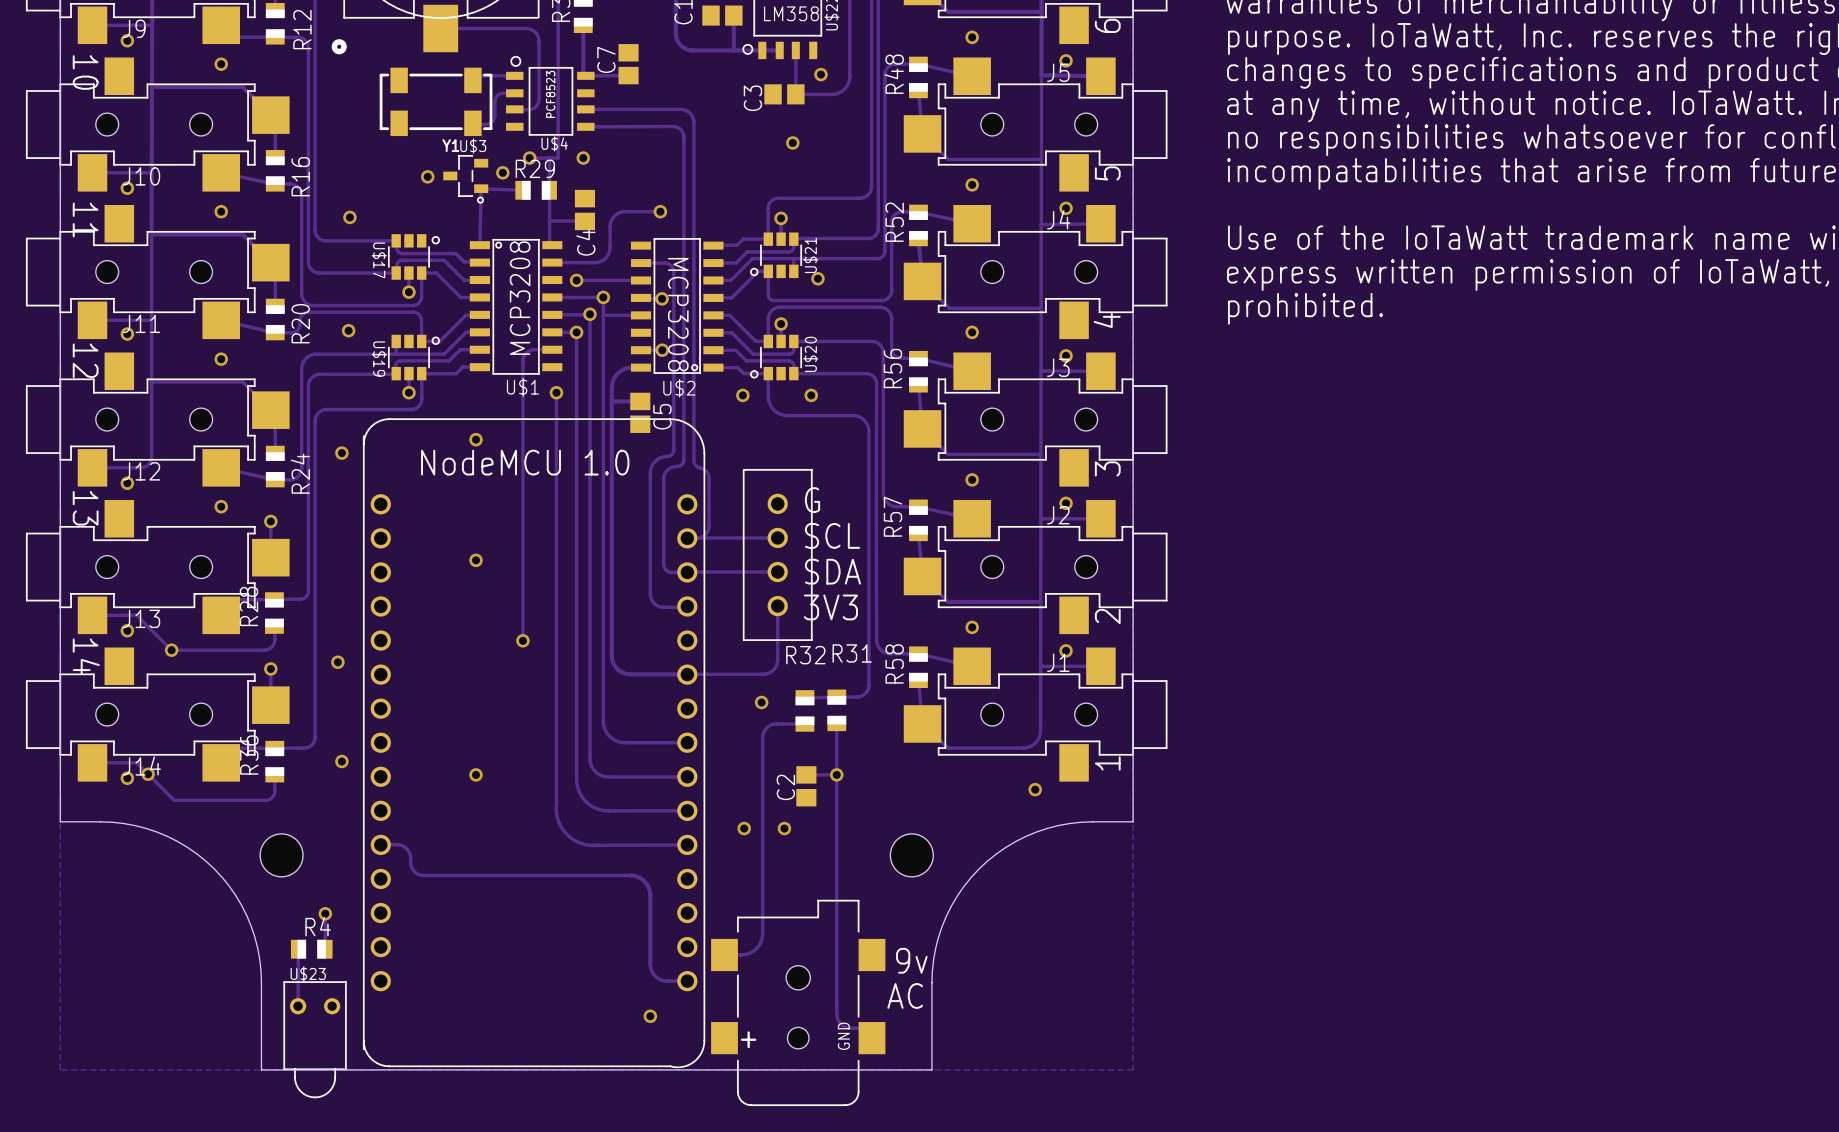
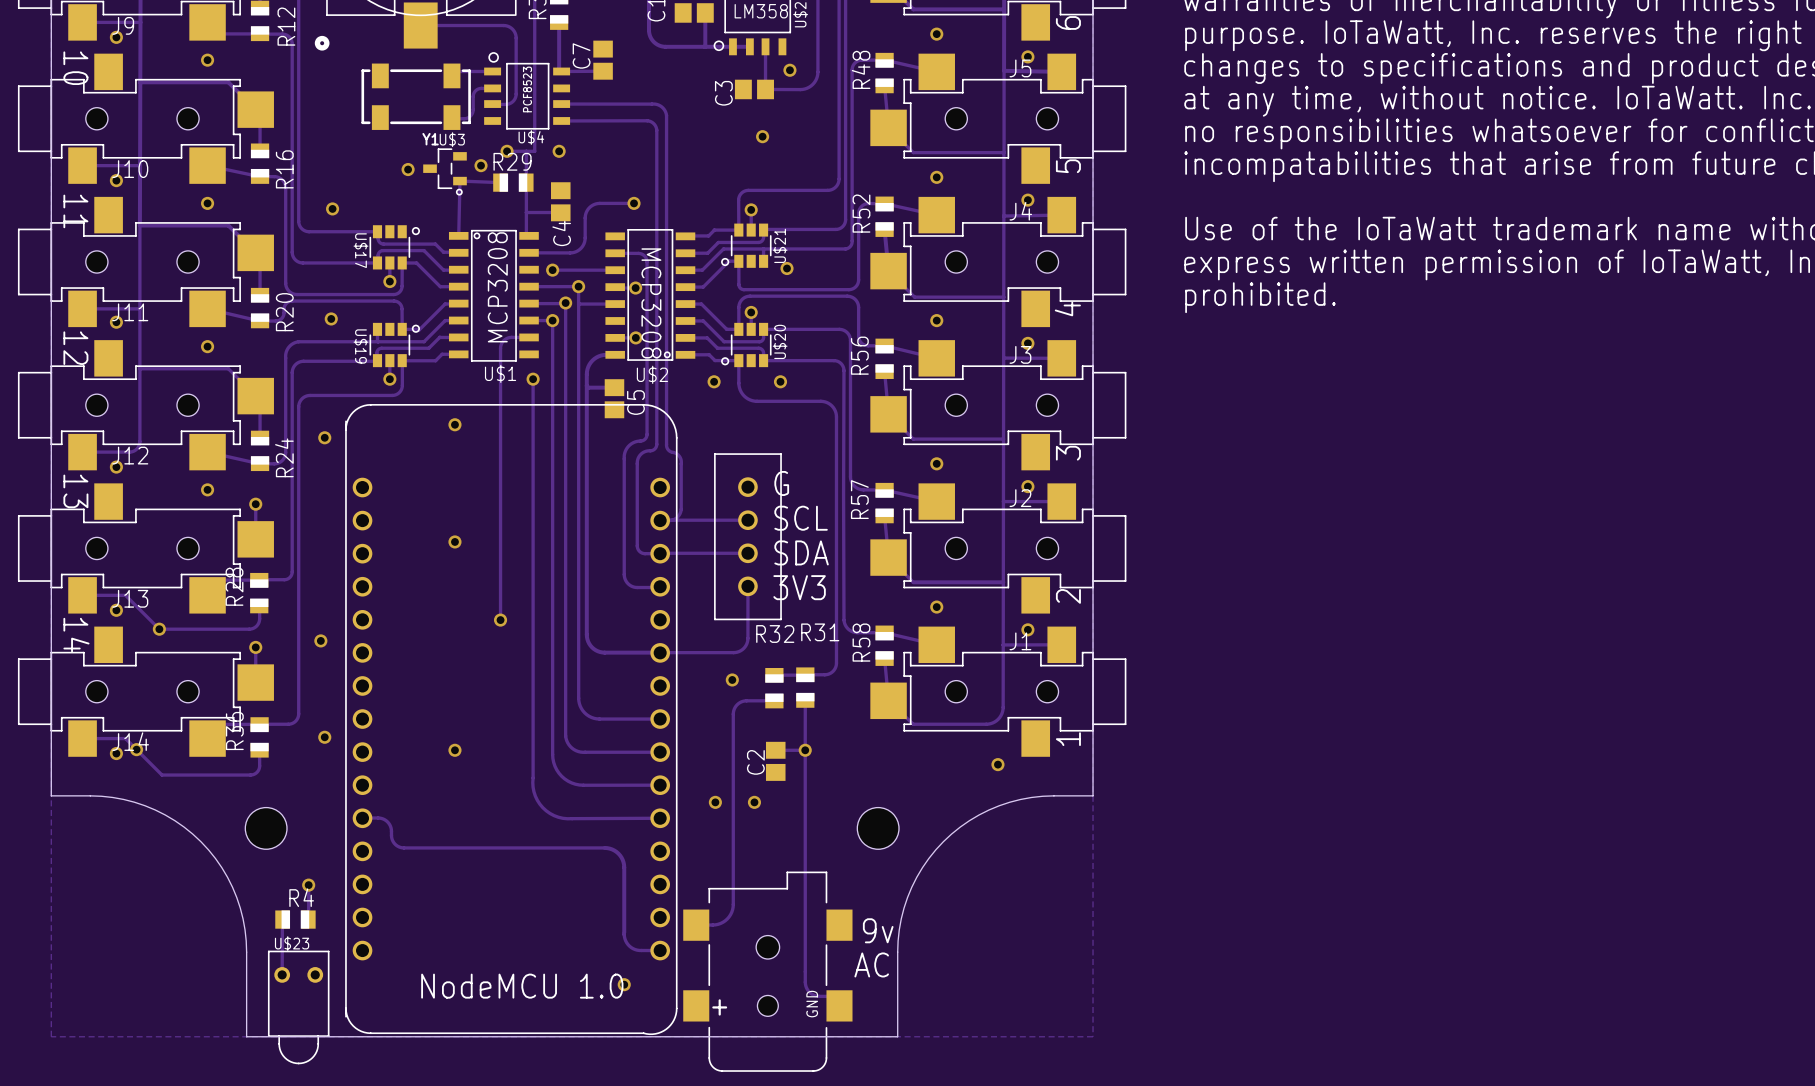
text: NodeMCU 1.0 (525, 462) -> none
text: none -> NodeMCU 1.0 (522, 986)

